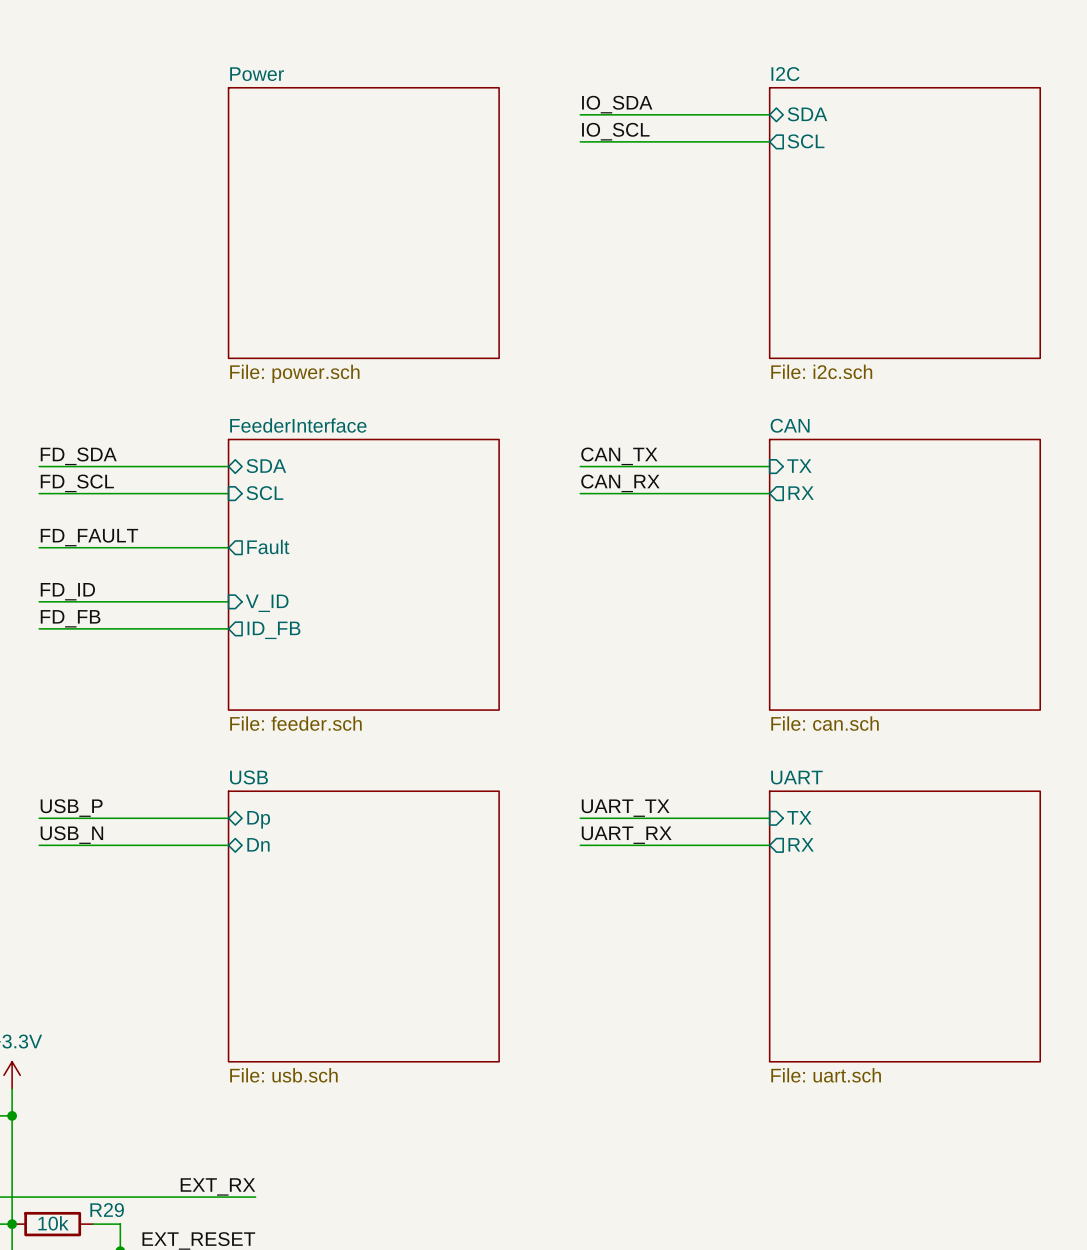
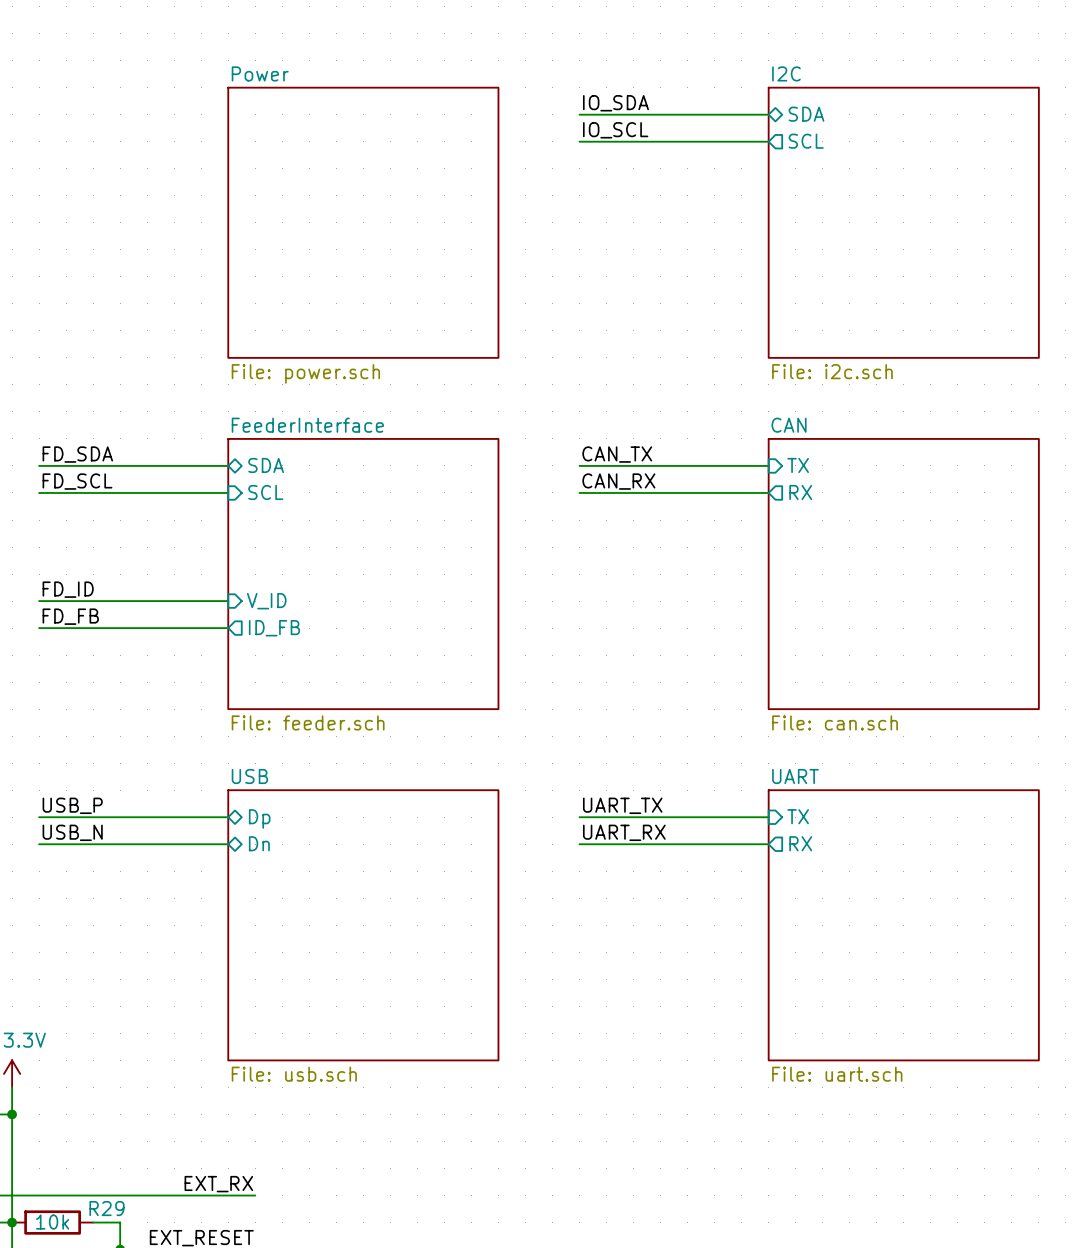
label: FD_FAULT (89, 537) -> none
sheet pin: Fault (268, 546) -> none
wire: (39, 547) (228, 547) -> none

